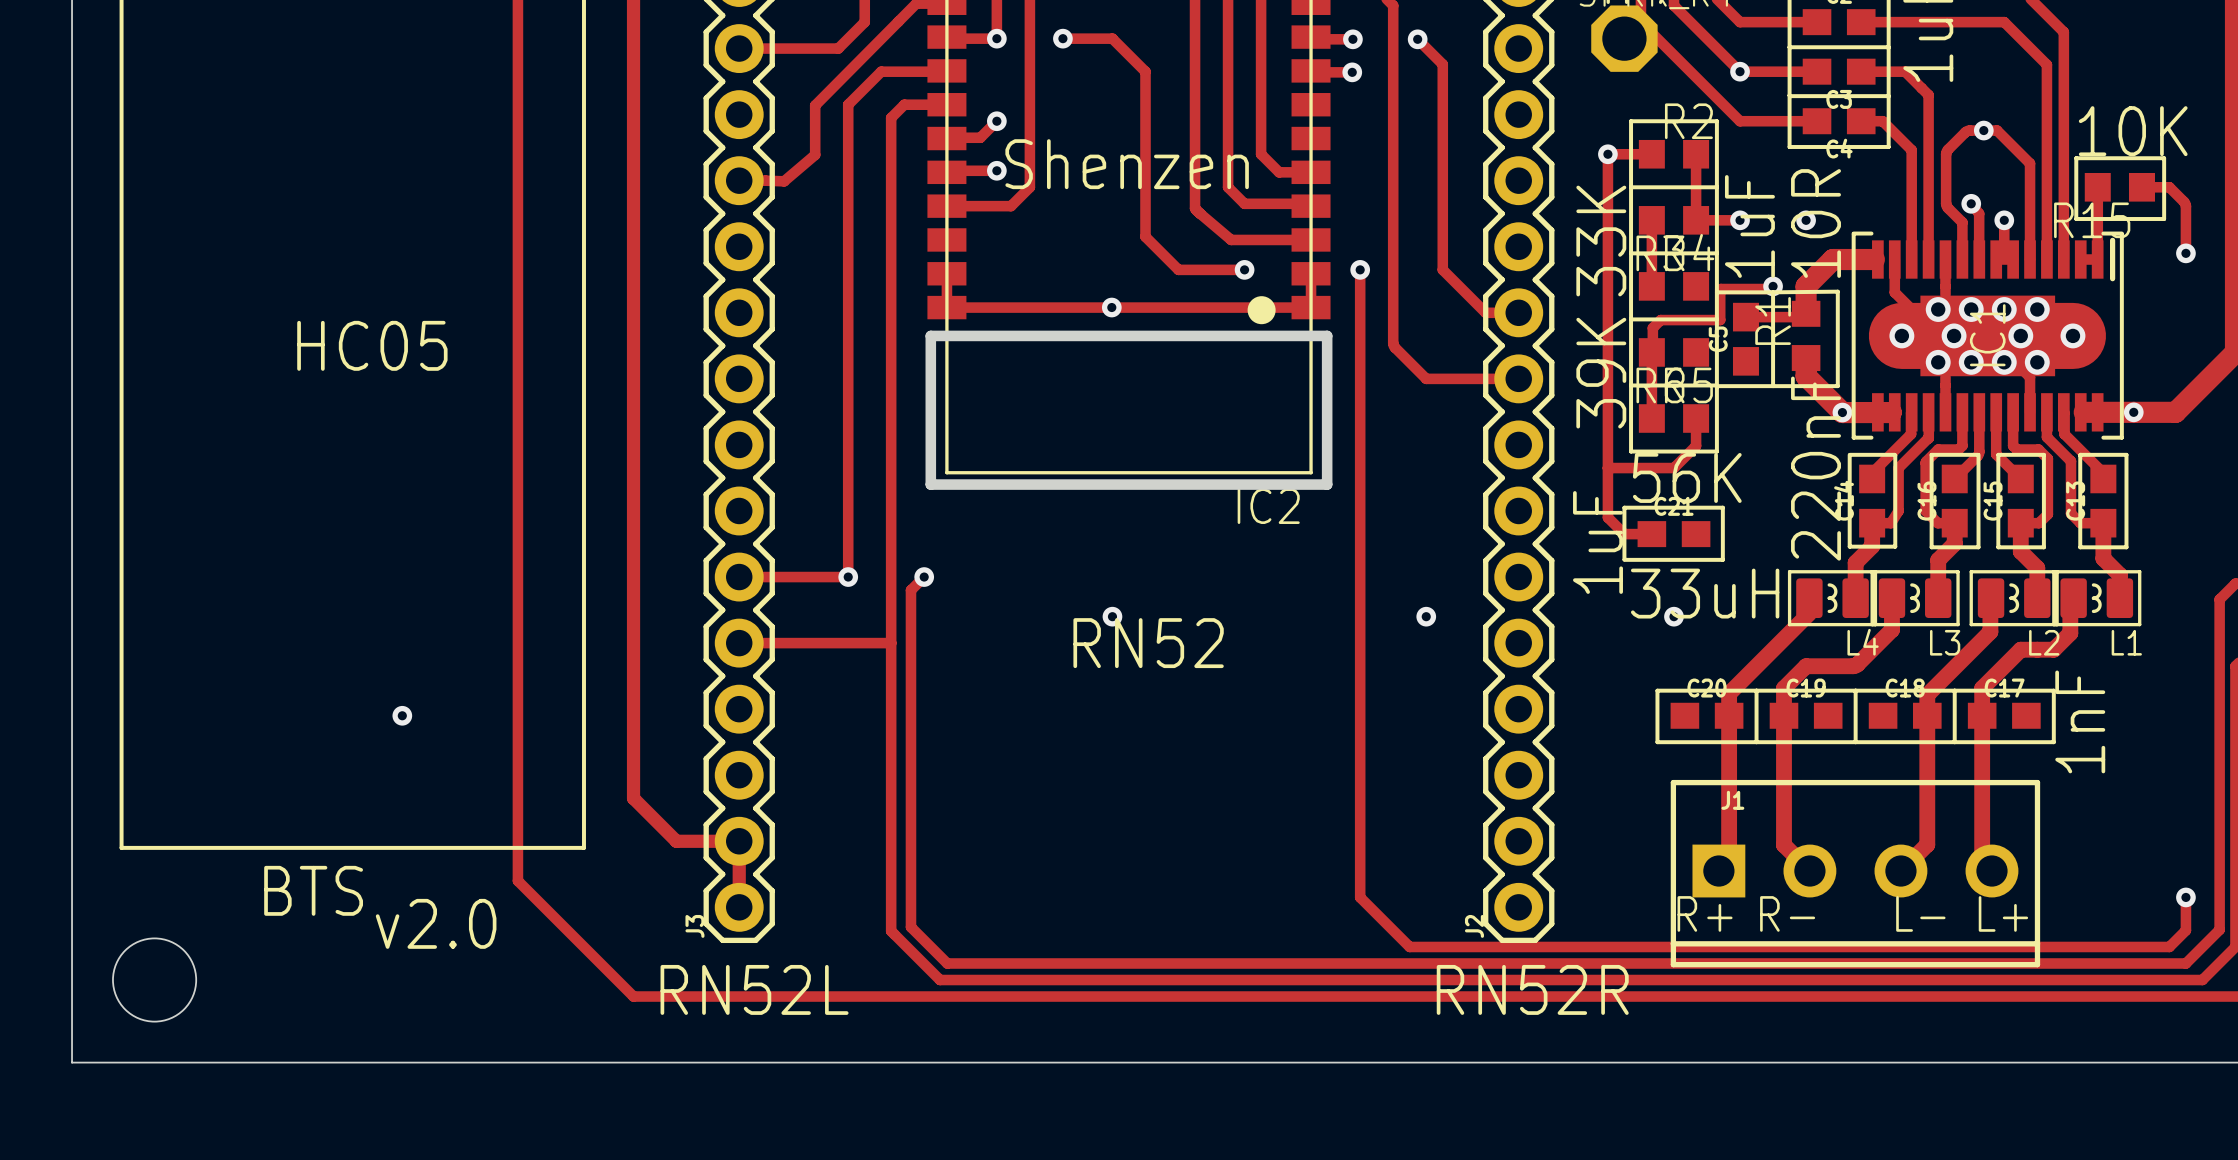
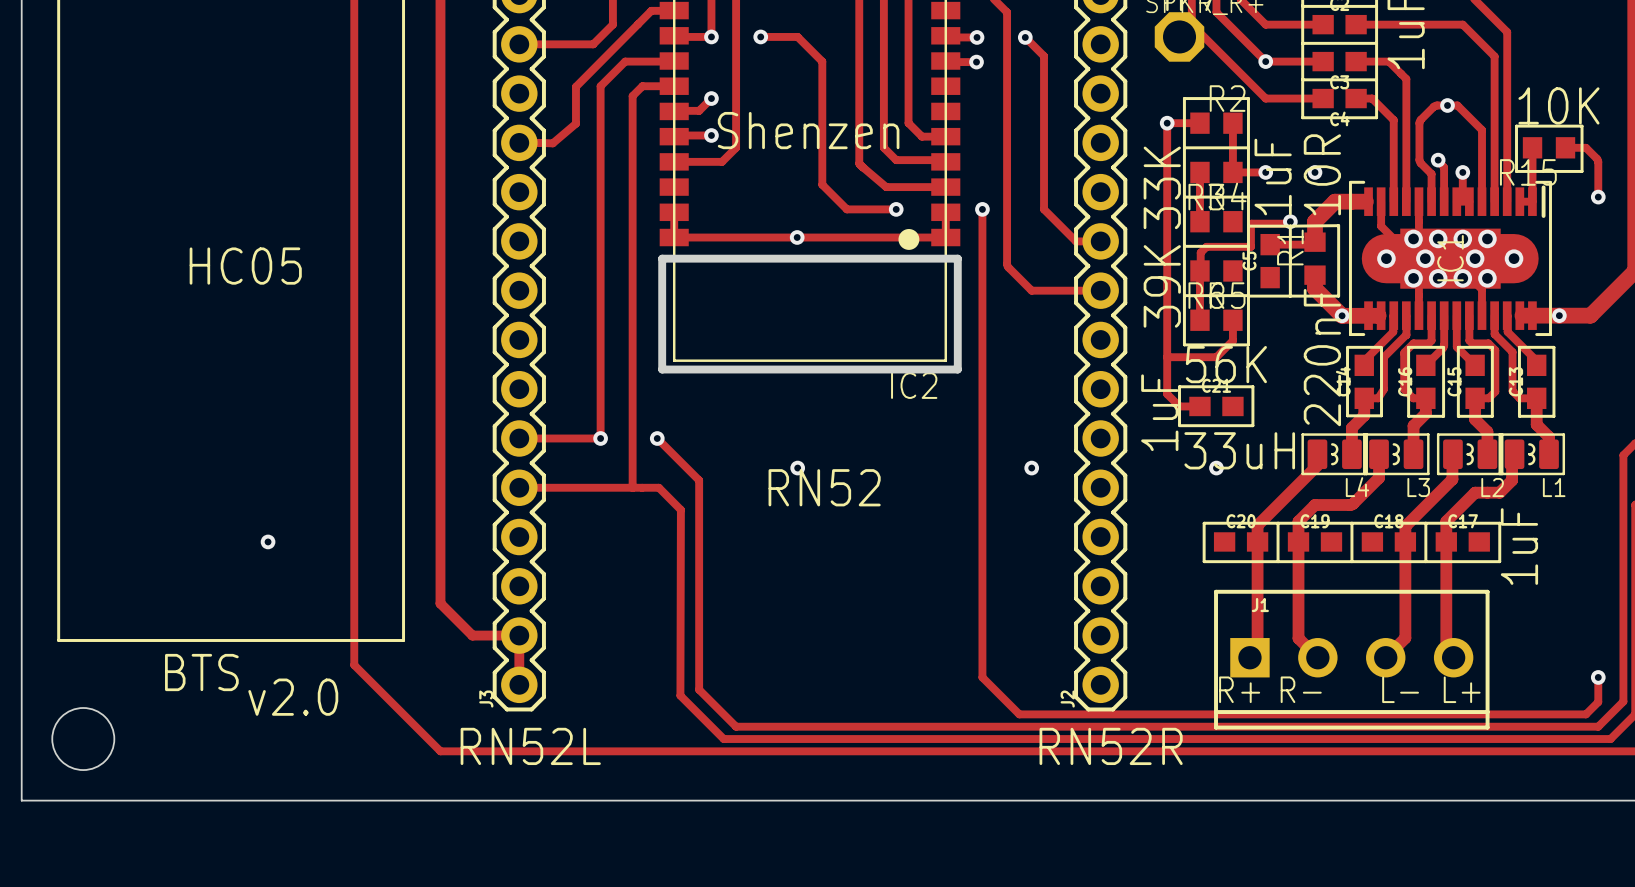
track: (924, 577) (910, 590) (910, 927) (947, 963) (1029, 963) -> (657, 438) (699, 480) (699, 689) (736, 726)
track: (891, 643) (891, 931) (940, 980) (1013, 980) -> (632, 487) (658, 487) (680, 509) (680, 695) (723, 739)
text: 1nF (2080, 721) -> 1uF (1519, 546)

